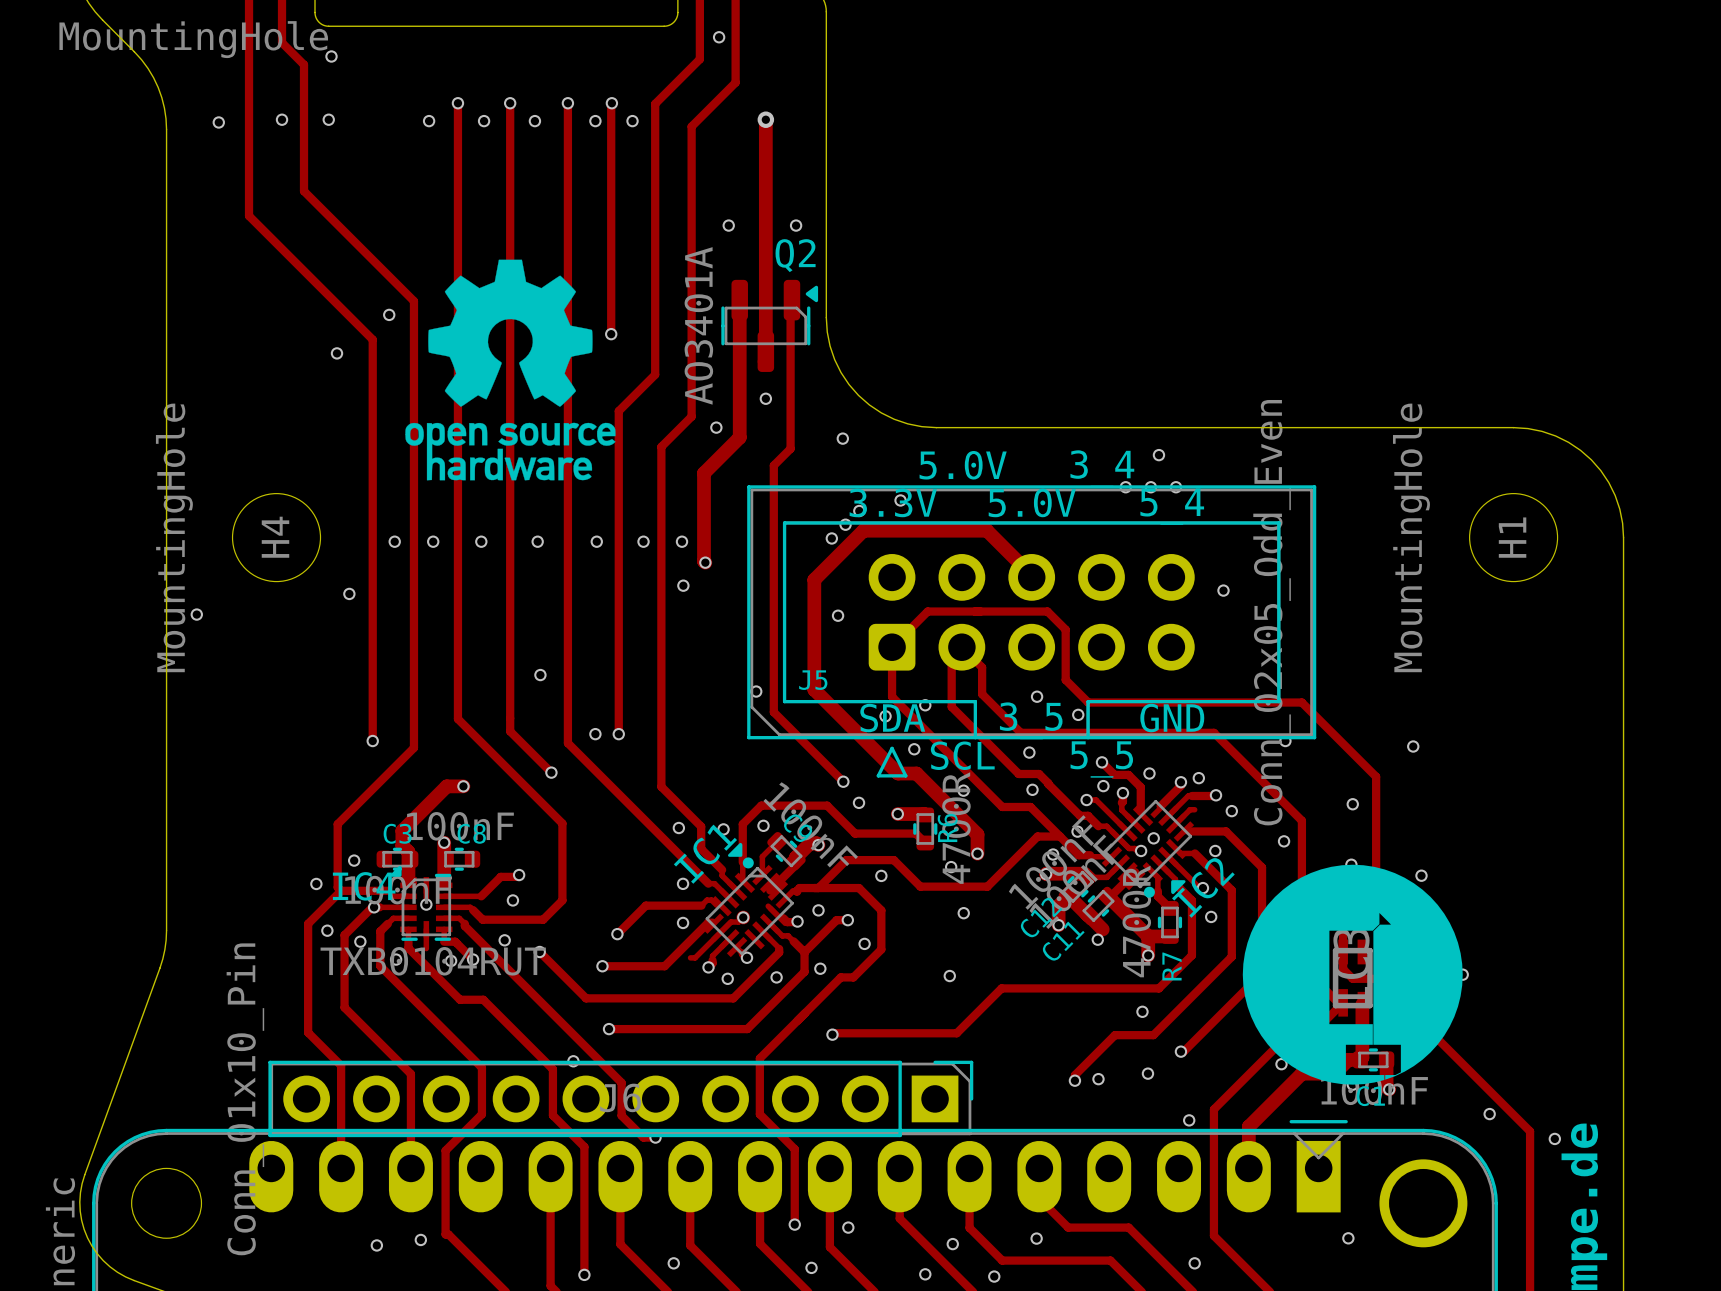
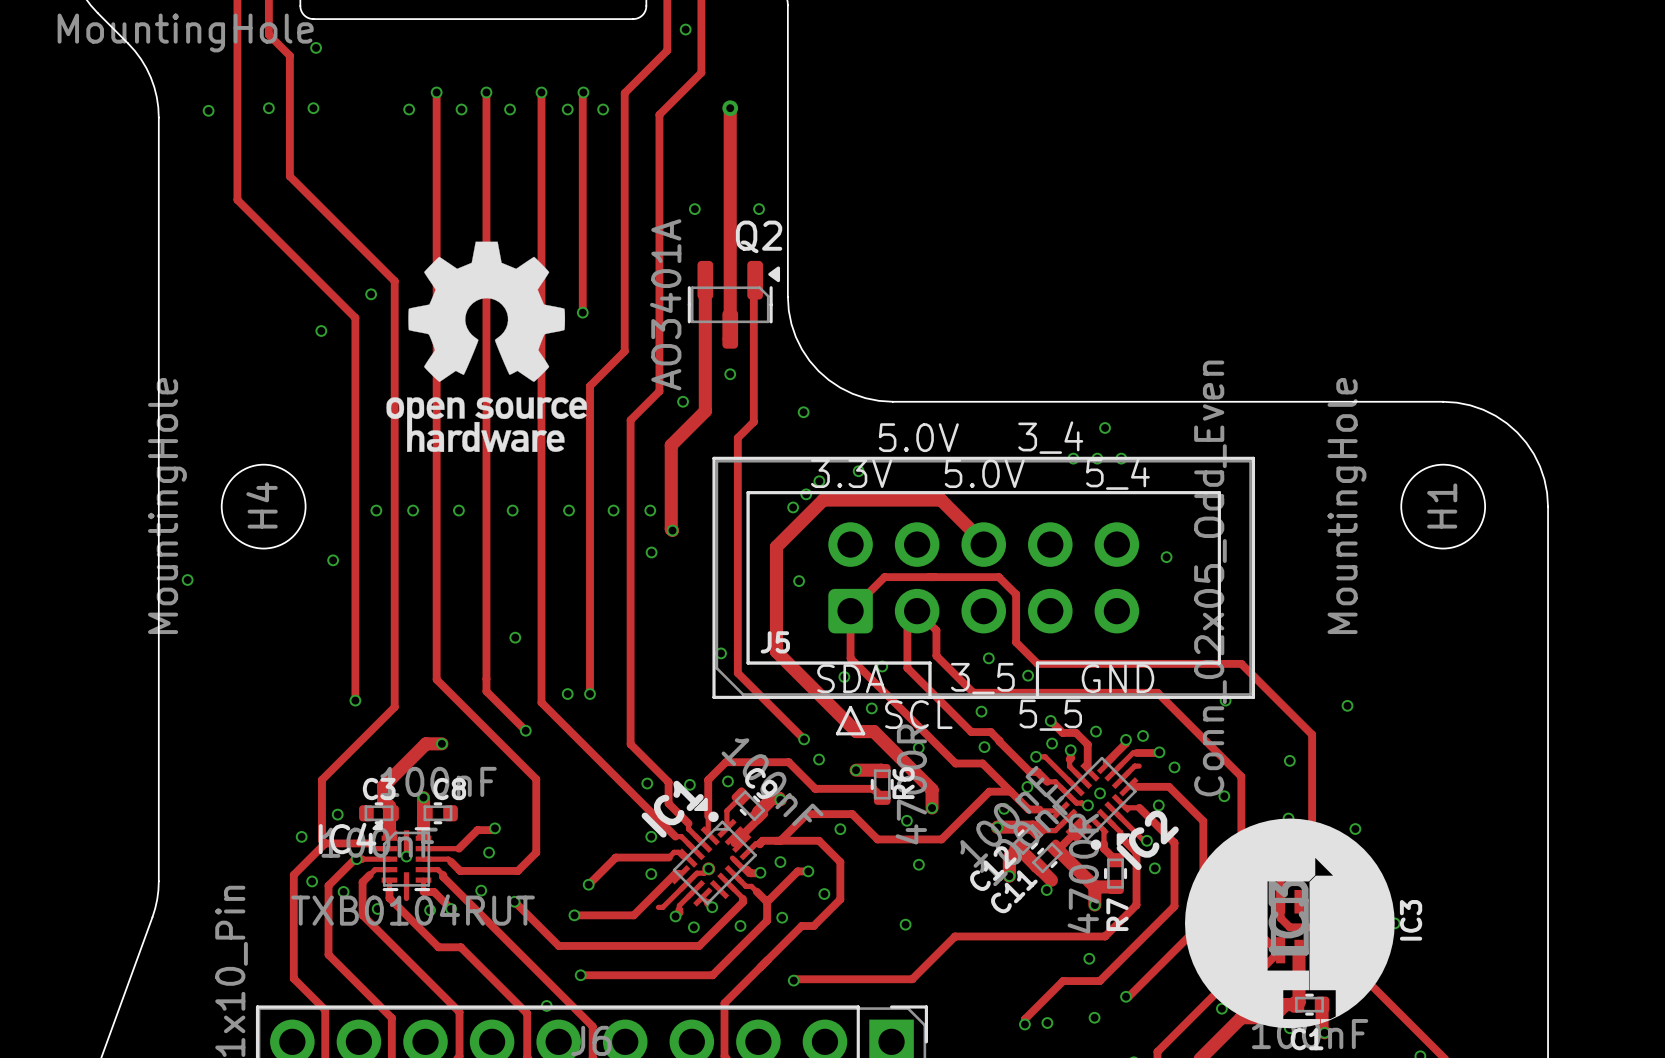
drawing shape: [1242, 864, 1463, 1085] -> [1185, 818, 1395, 1029]
text: none -> IC3 (1411, 920)

